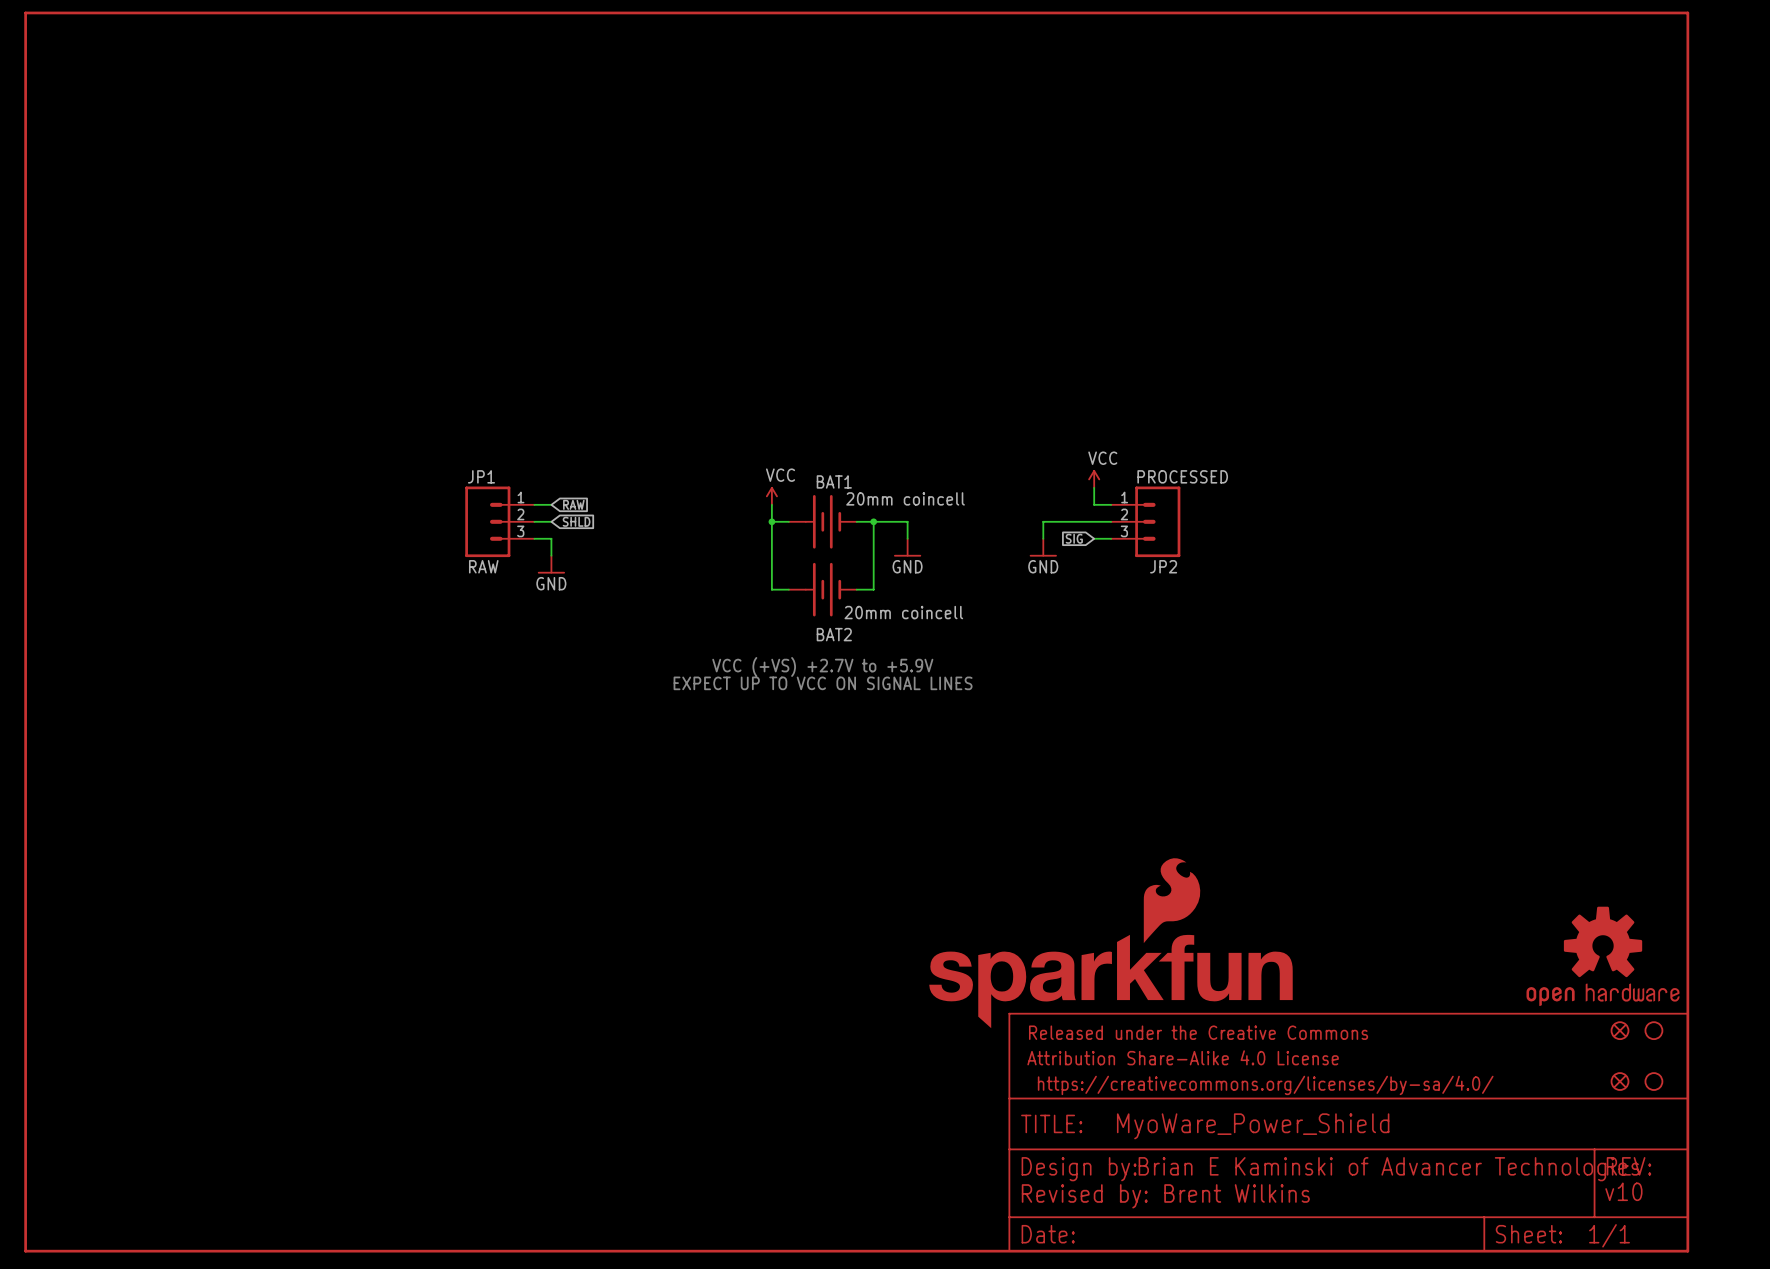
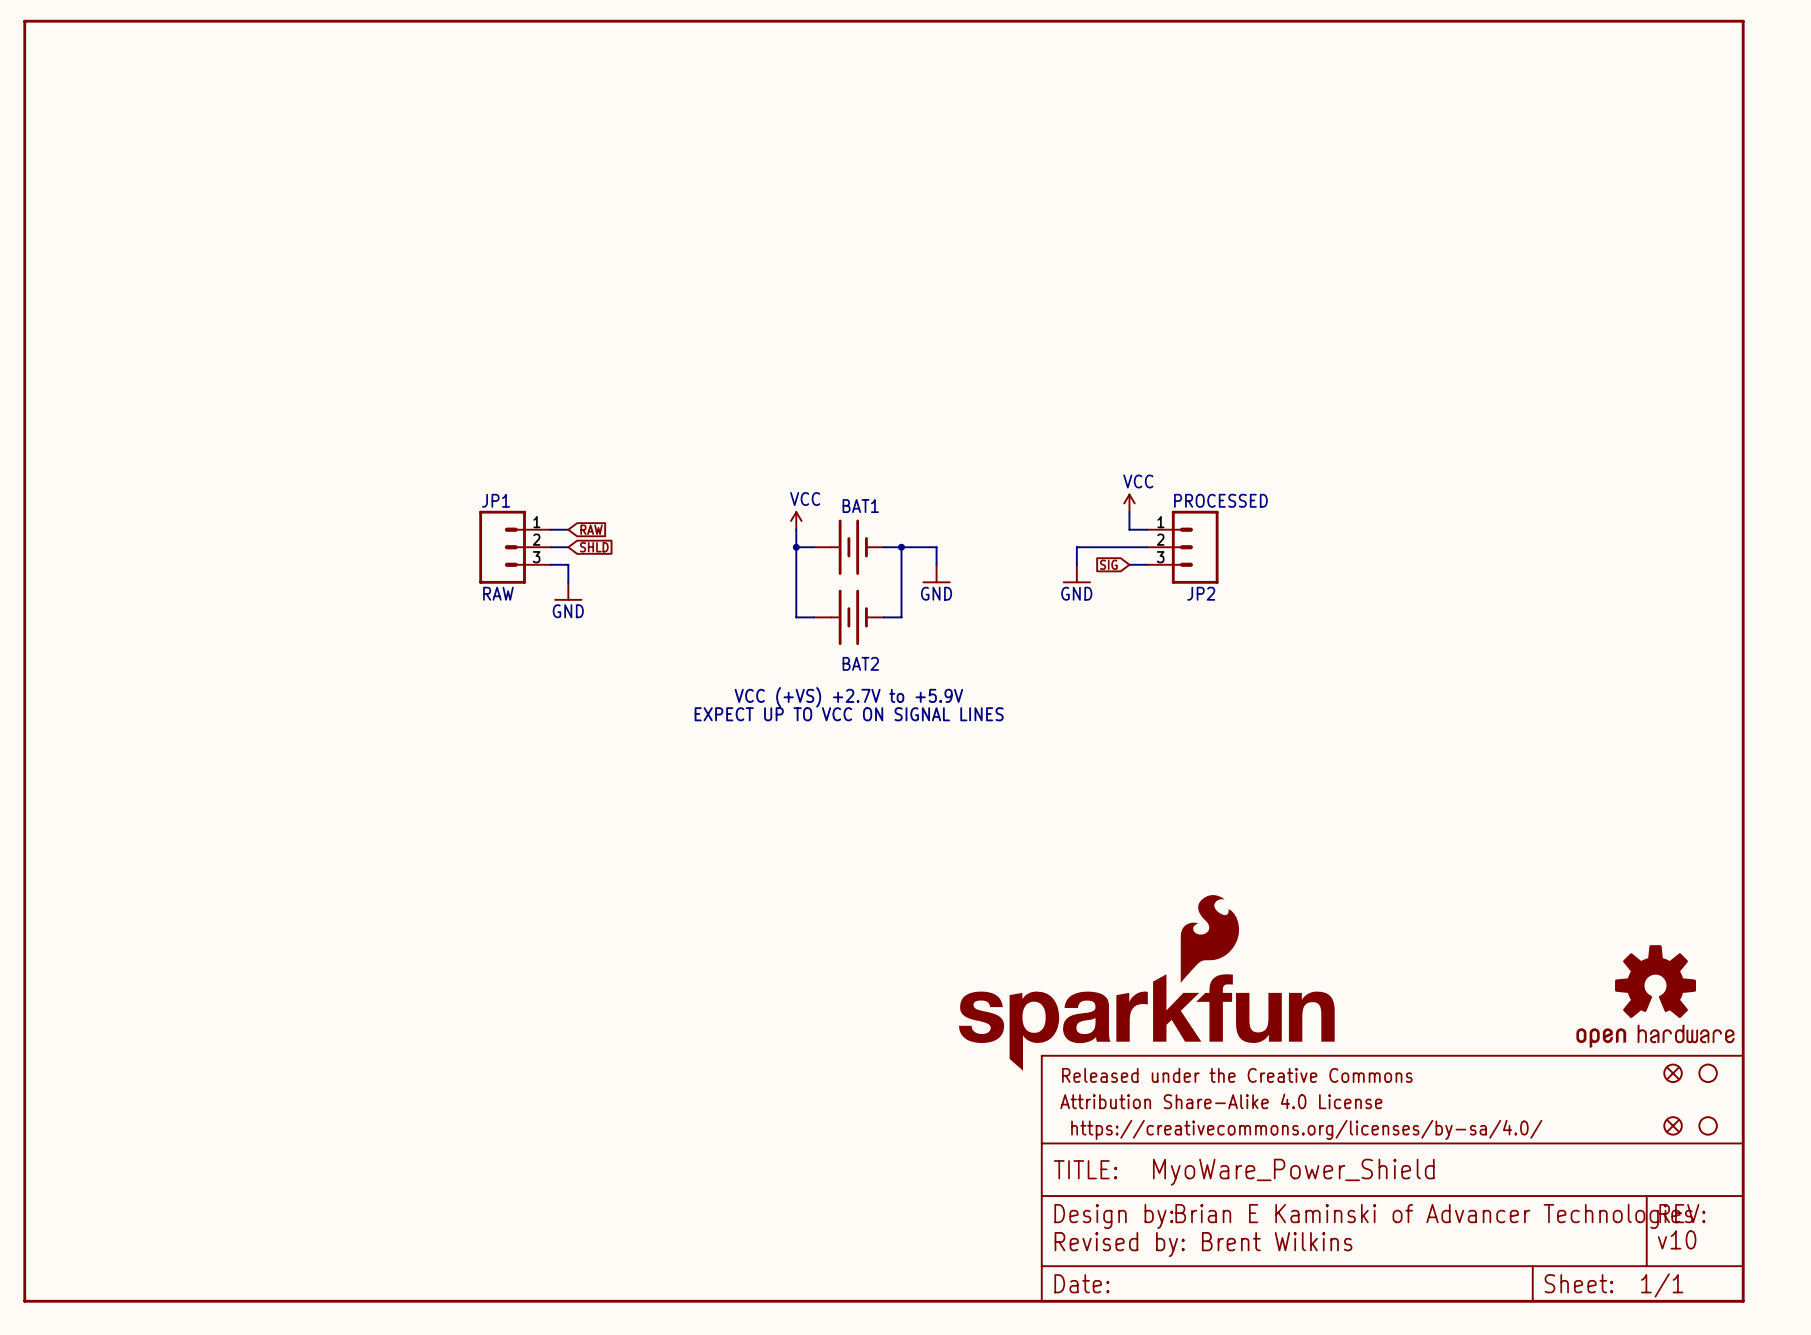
BAT1 value: 20mm coincell (905, 498) -> none
BAT2 value: 20mm coincell (903, 612) -> none

